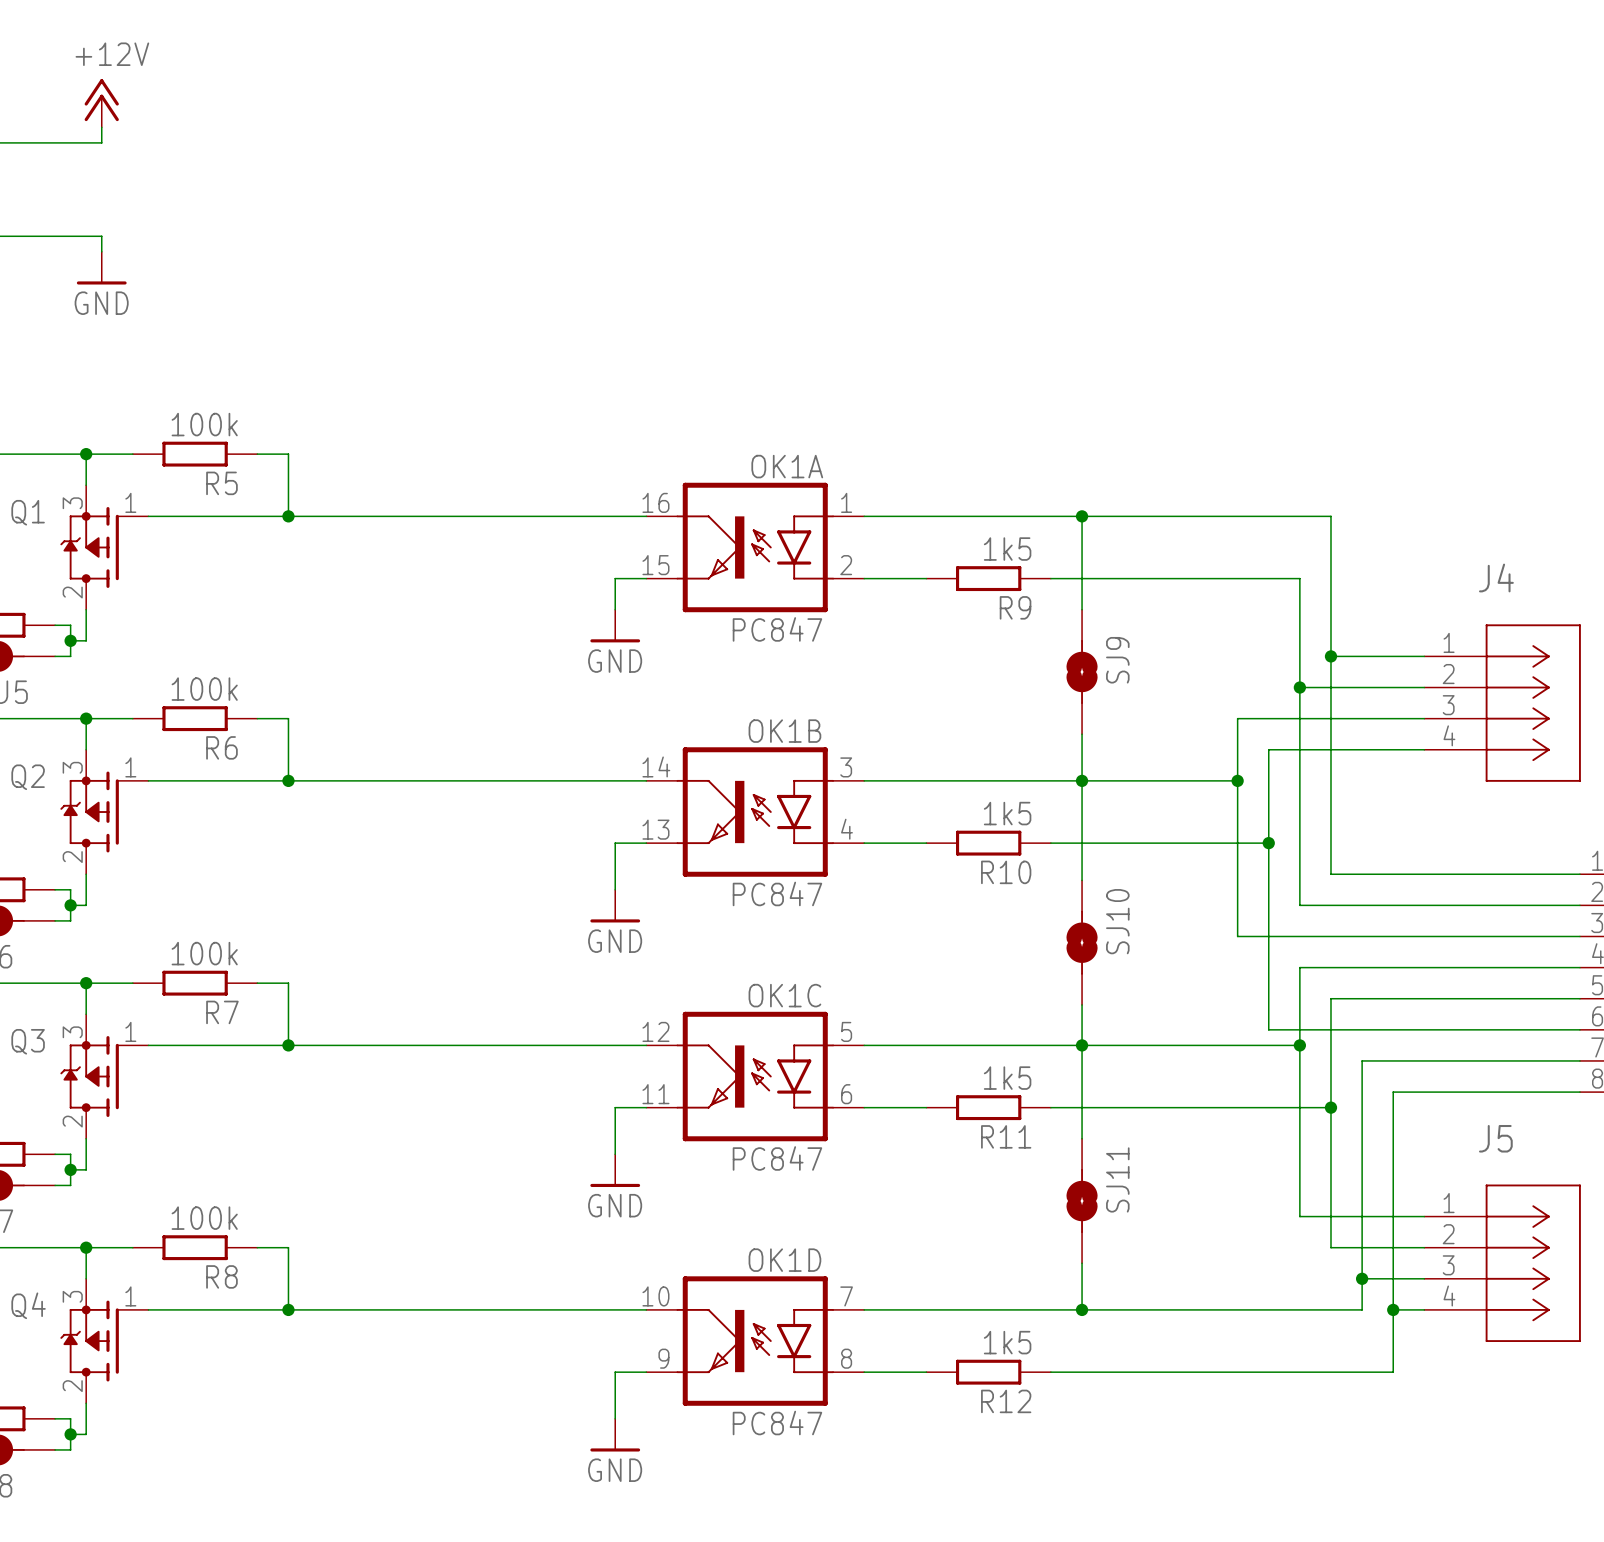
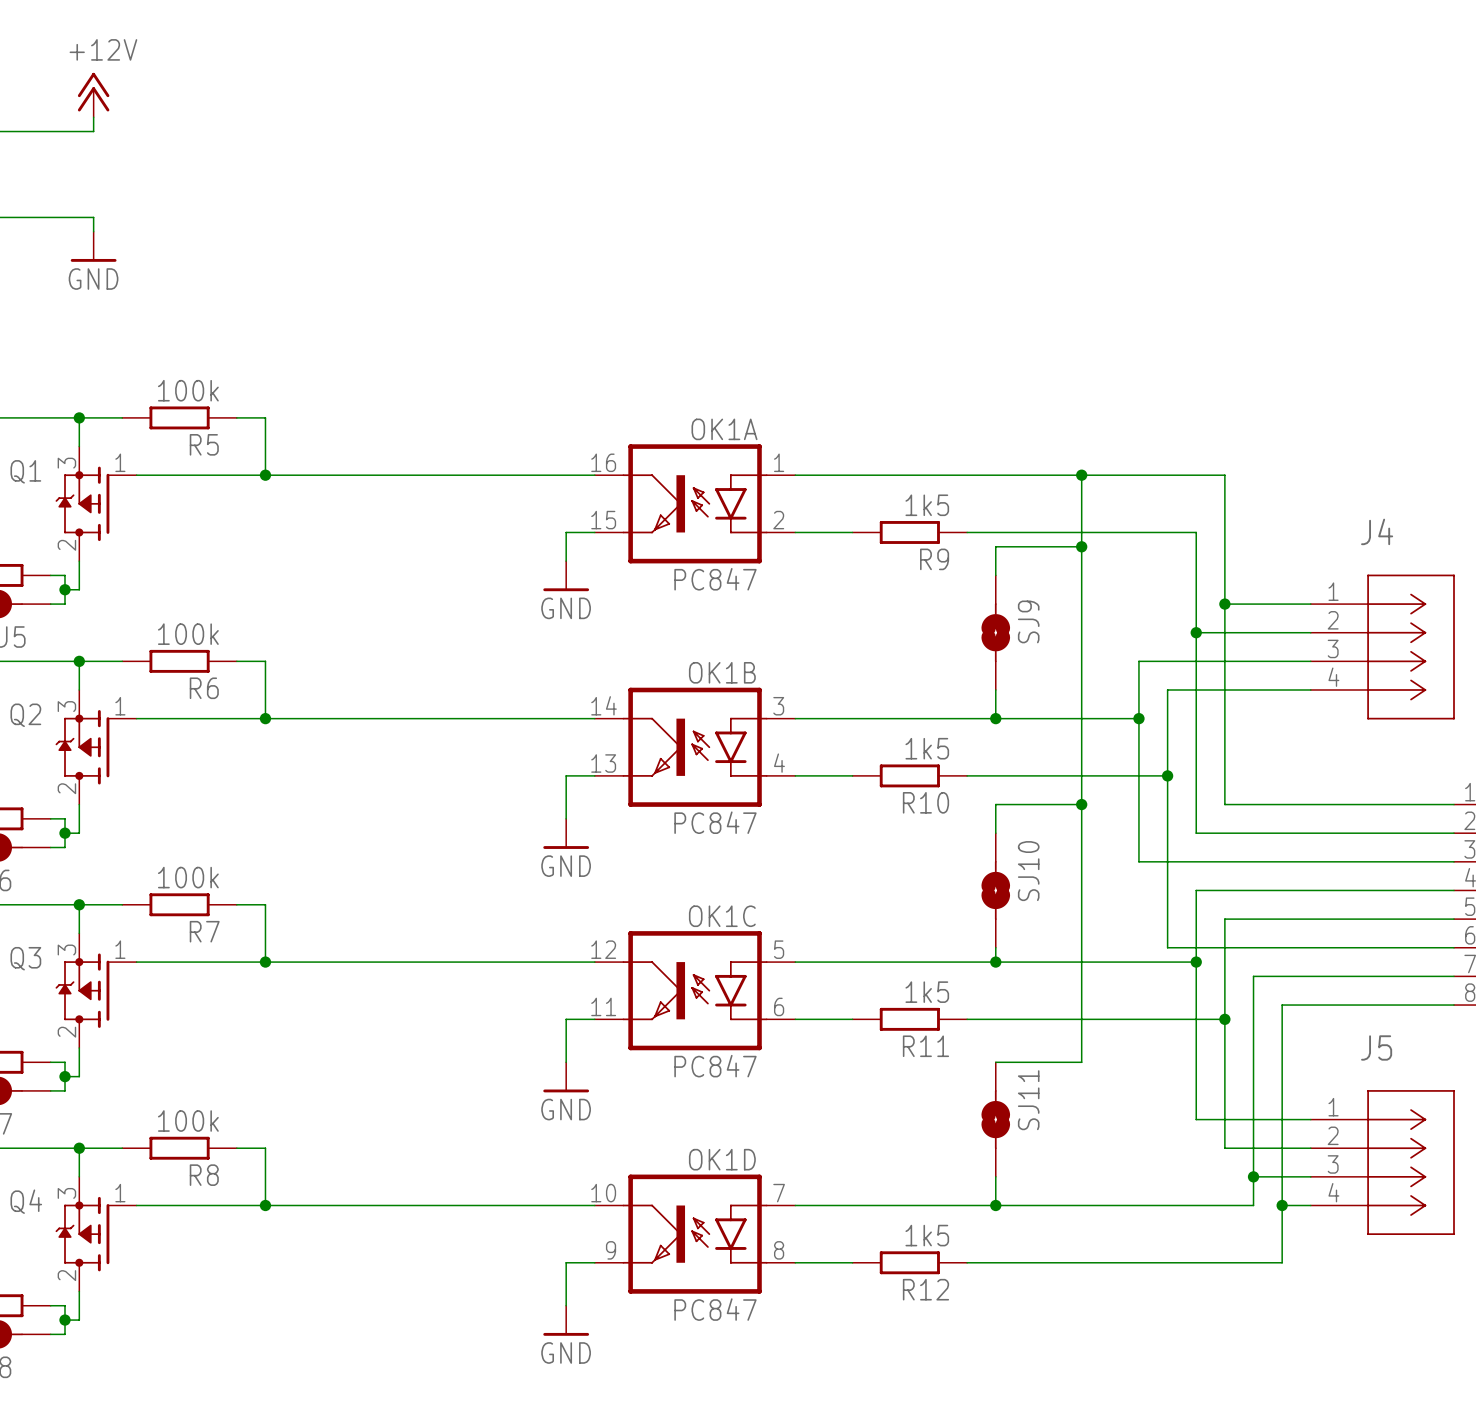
wire: (1082, 516) (1082, 594) -> (1081, 546) (995, 546)
junction: (1082, 516) -> none
wire: none -> (1081, 475) (1081, 1062) (995, 1062)
junction: none -> (1081, 475)
junction: none -> (1081, 546)
SJ9 position: (1082, 671) -> (995, 632)
wire: (1082, 780) (1082, 874) -> (1081, 804) (995, 804)
junction: none -> (1081, 804)
SJ10 position: (1082, 942) -> (995, 890)
wire: (1082, 1045) (1082, 1138) -> none
SJ11 position: (1082, 1201) -> (995, 1119)

